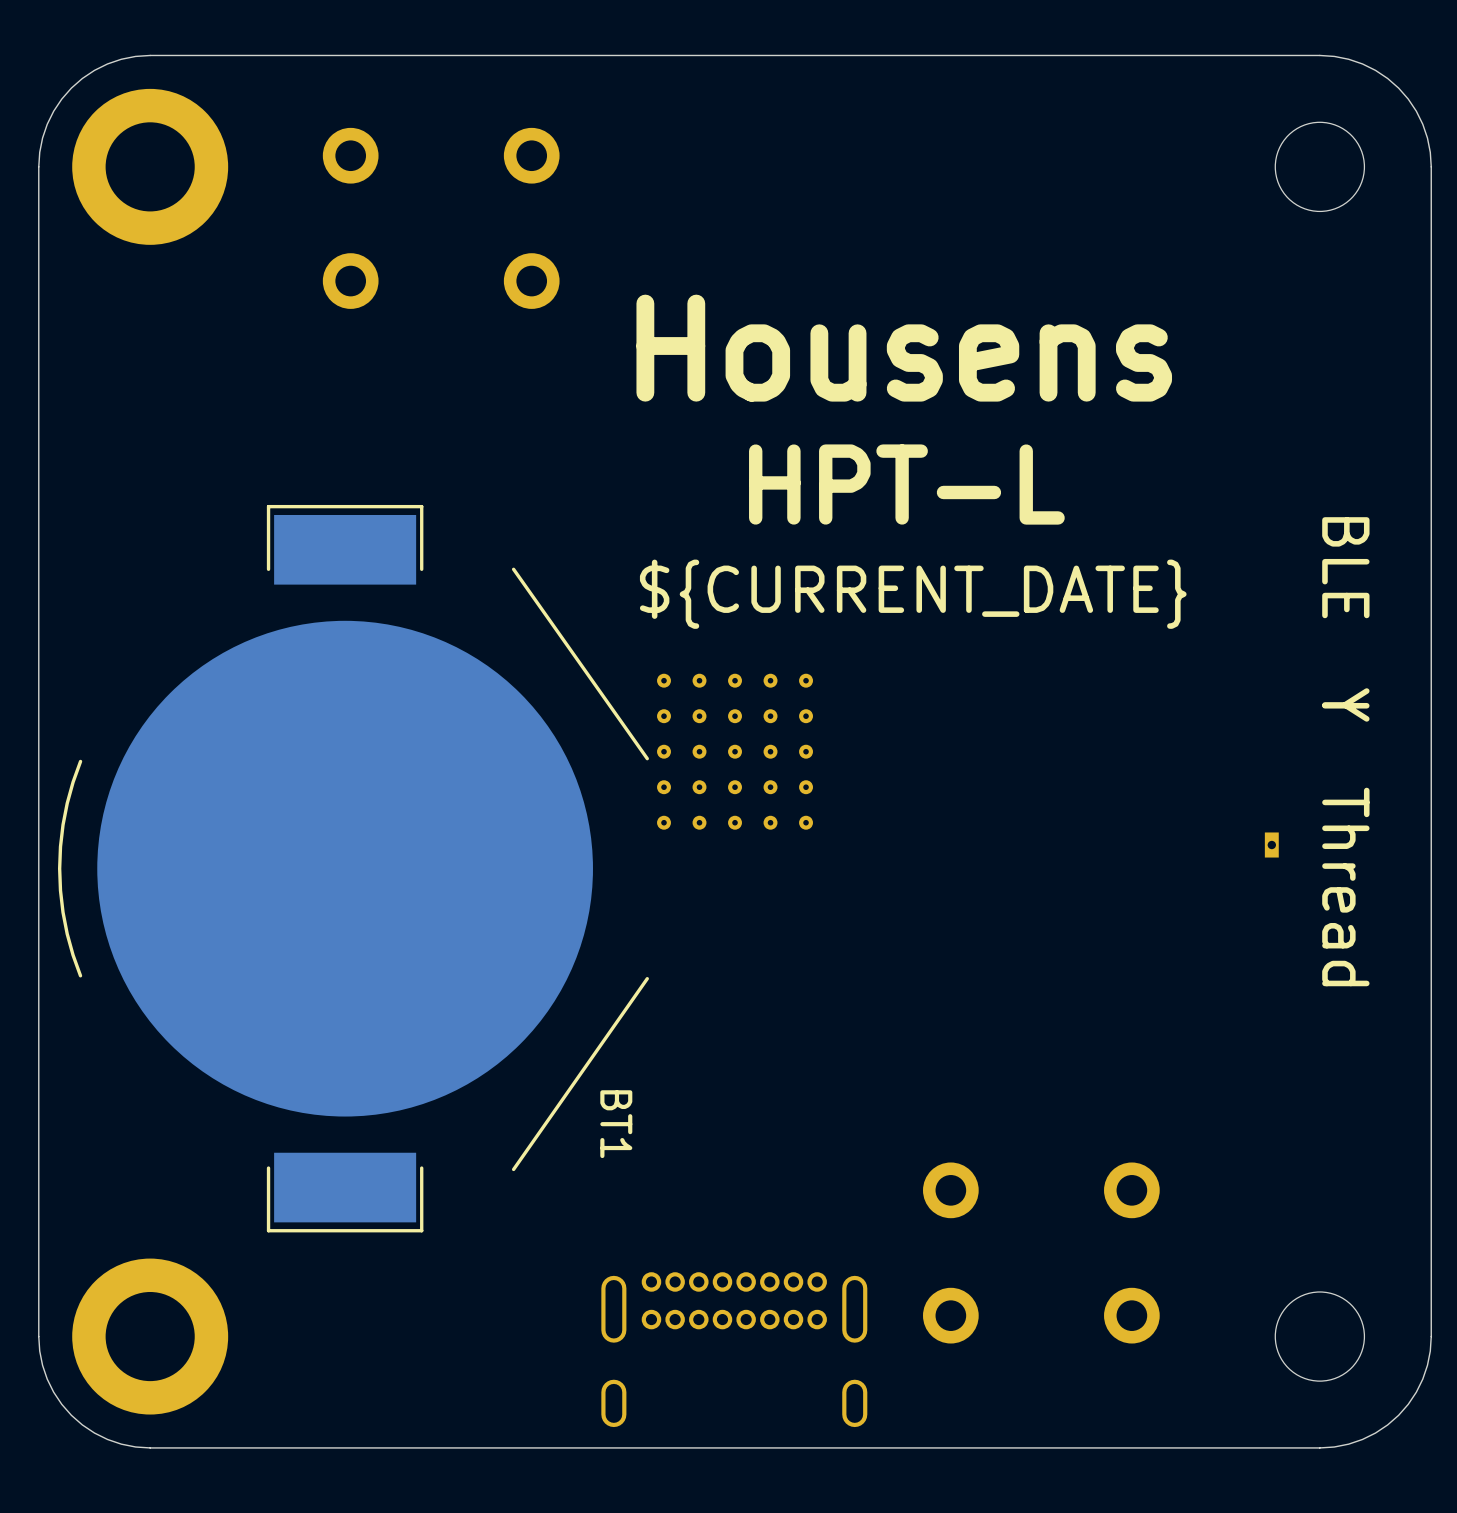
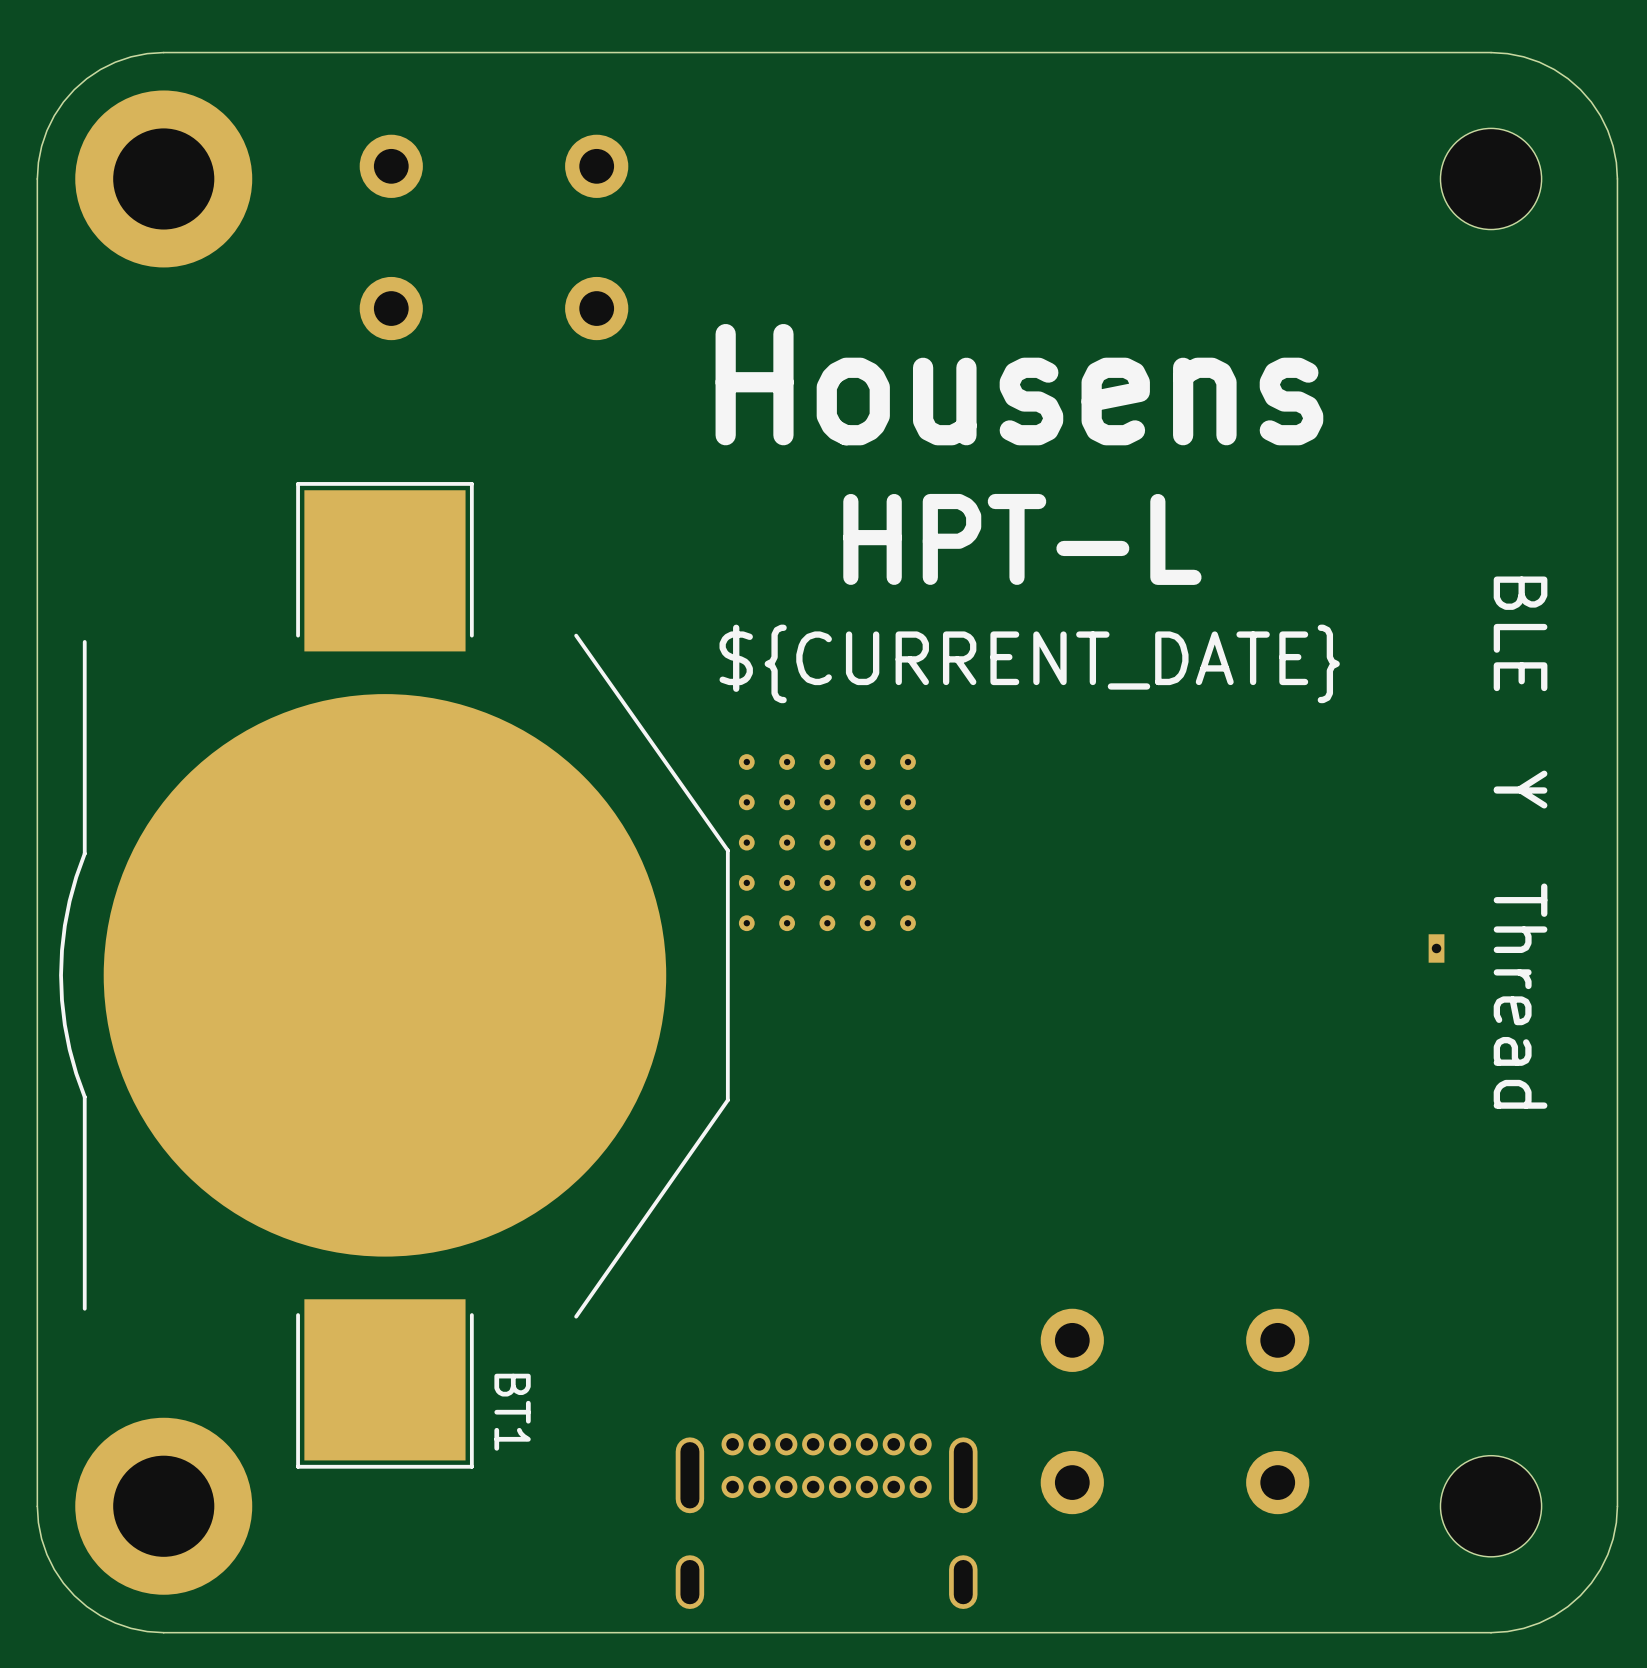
BT1 footprint: [57, 504, 649, 1233] -> [59, 482, 730, 1469]
BT1 name position: BT1 (616, 1124) -> BT1 (512, 1412)

